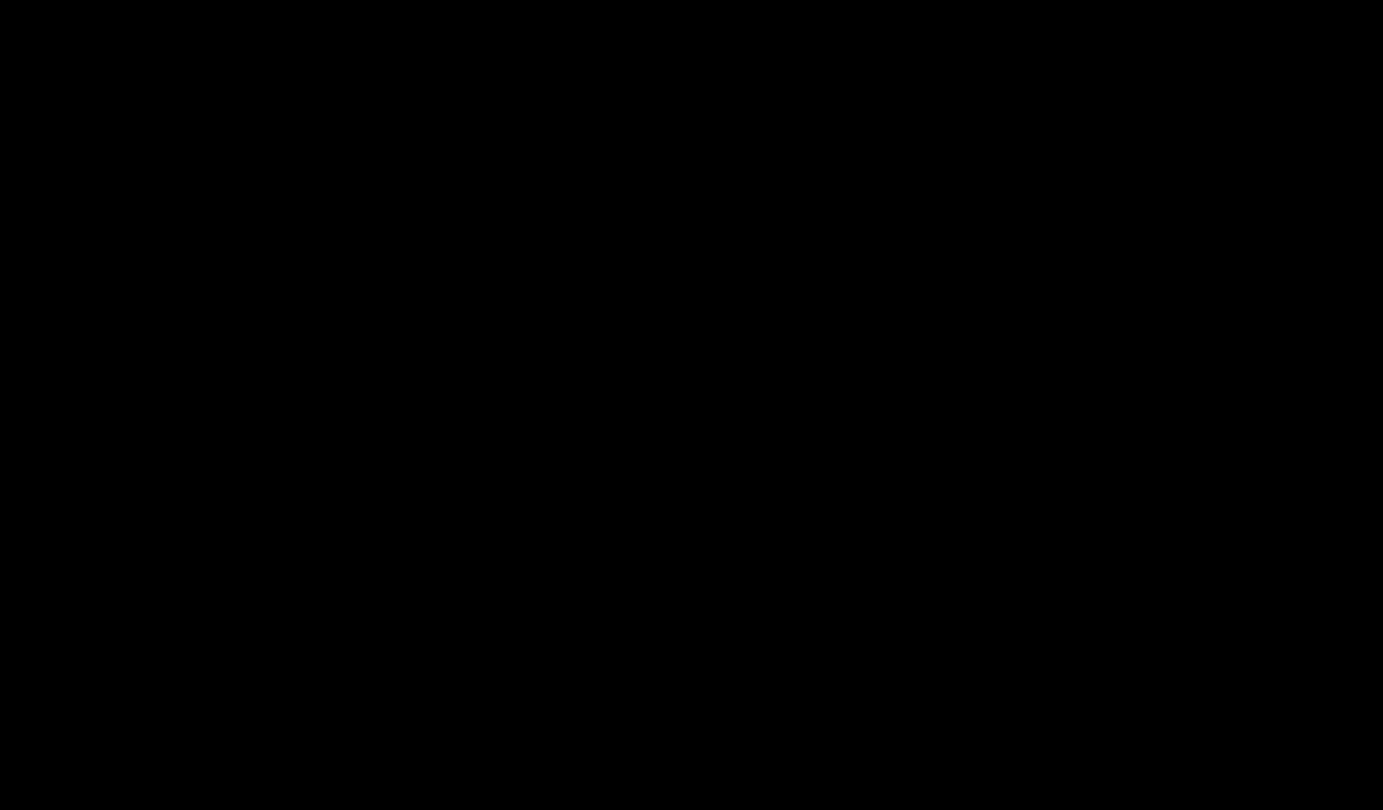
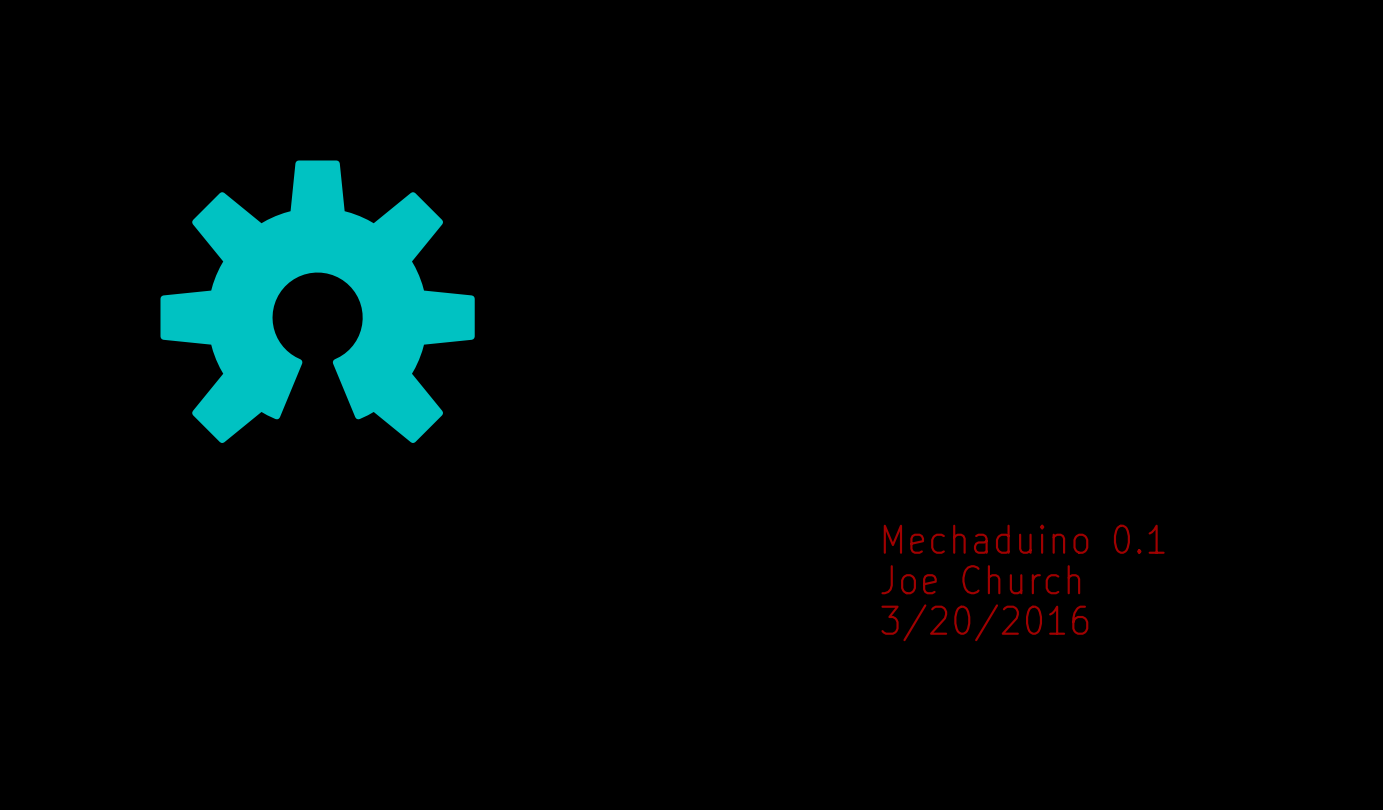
drawing: none -> [160, 160, 475, 444]
text: none -> Mechaduino 0.1 (1024, 539)
text: none -> Joe Church (980, 579)
text: none -> 3/20/2016 (984, 622)

